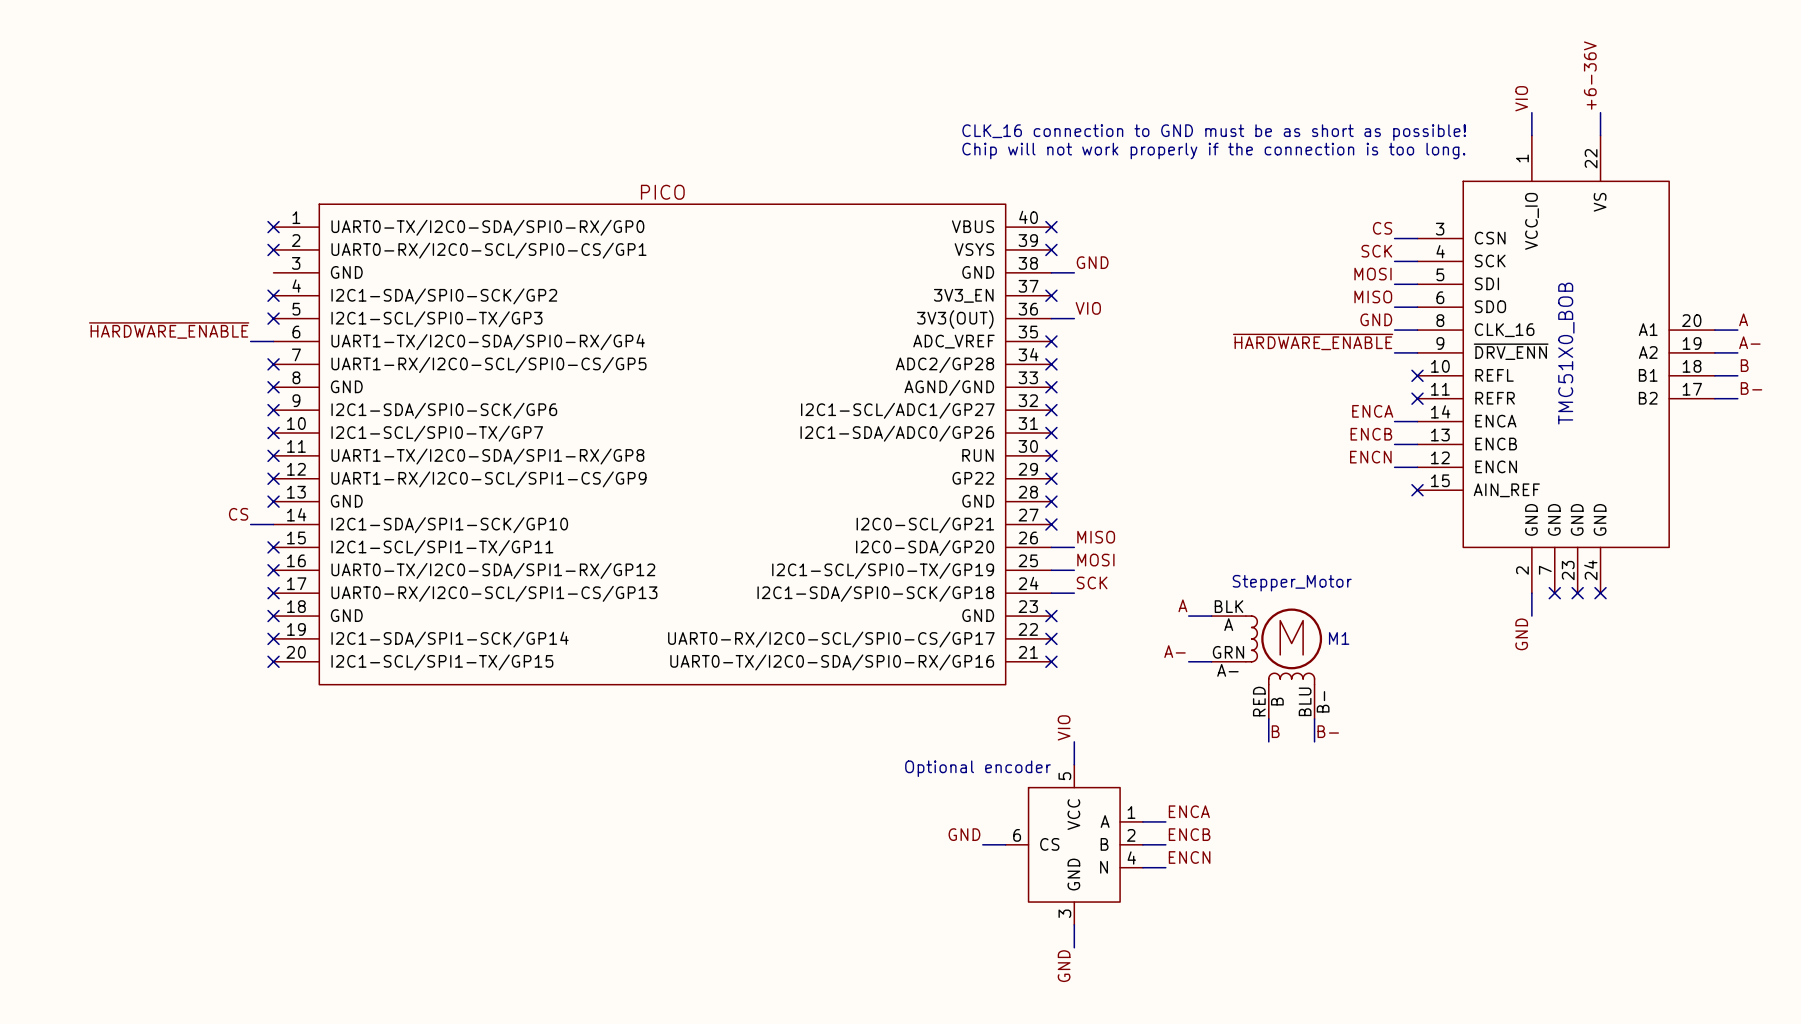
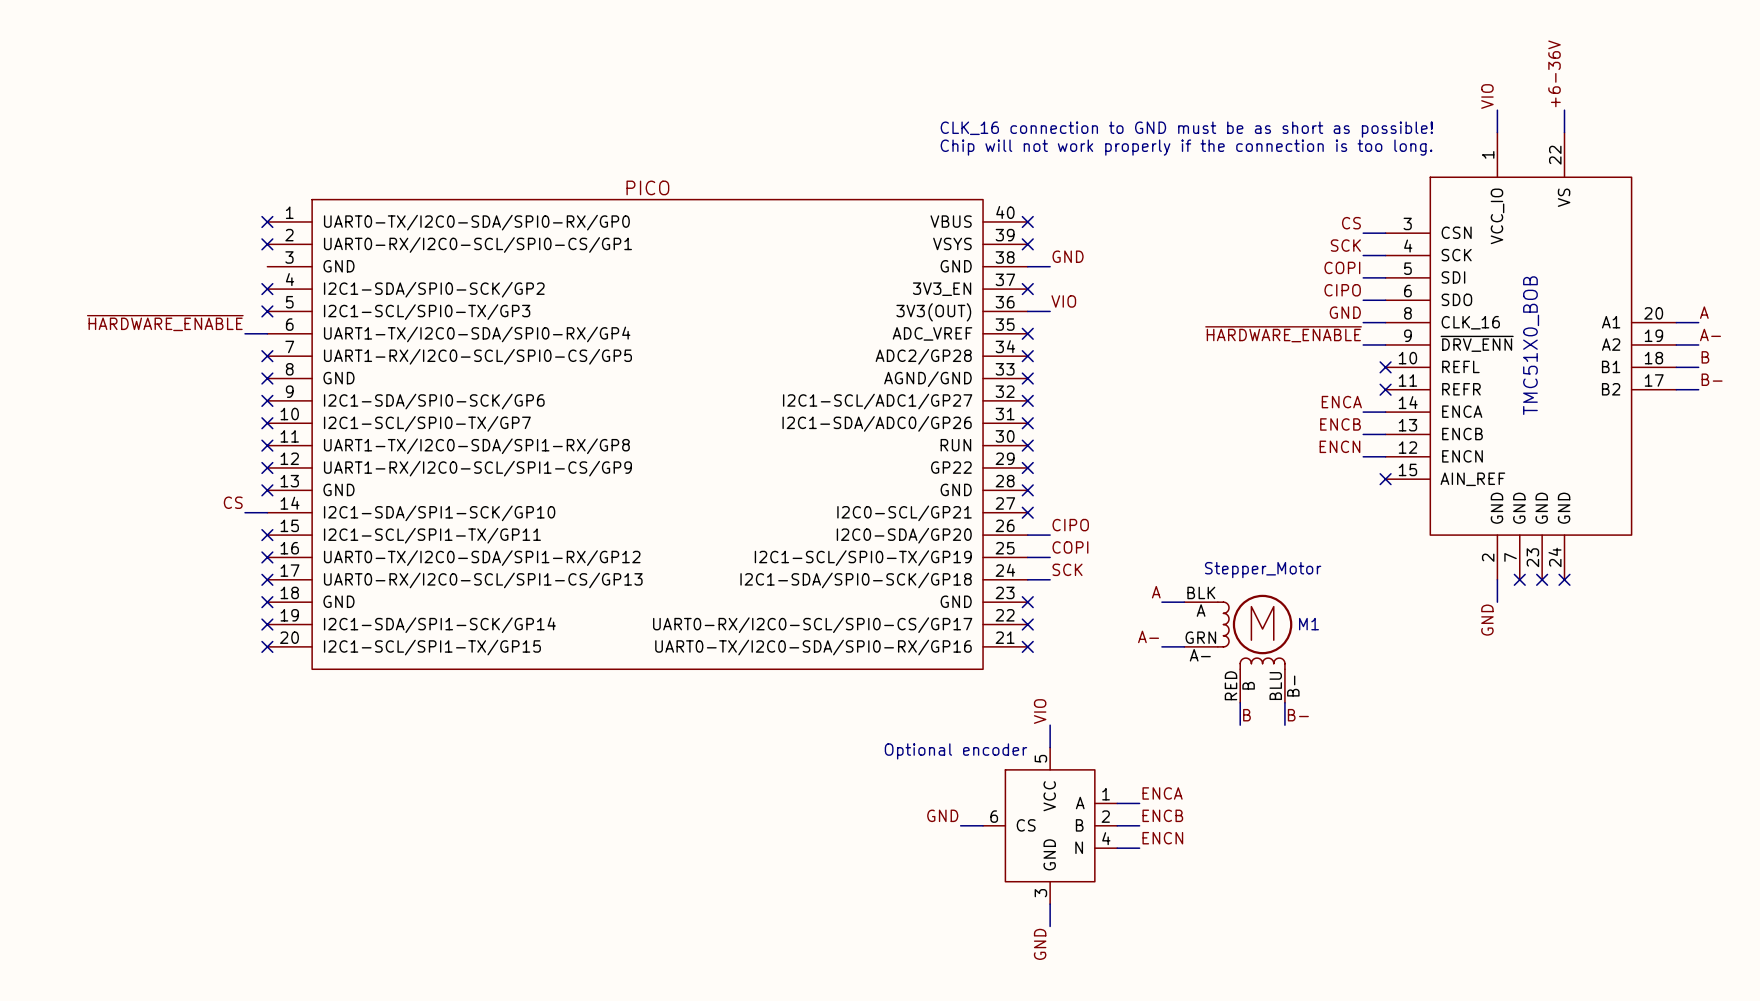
label: MOSI (1373, 274) -> COPI (1342, 267)
label: MISO (1373, 296) -> CIPO (1342, 290)
label: MISO (1096, 537) -> CIPO (1070, 525)
label: MOSI (1095, 560) -> COPI (1070, 547)

